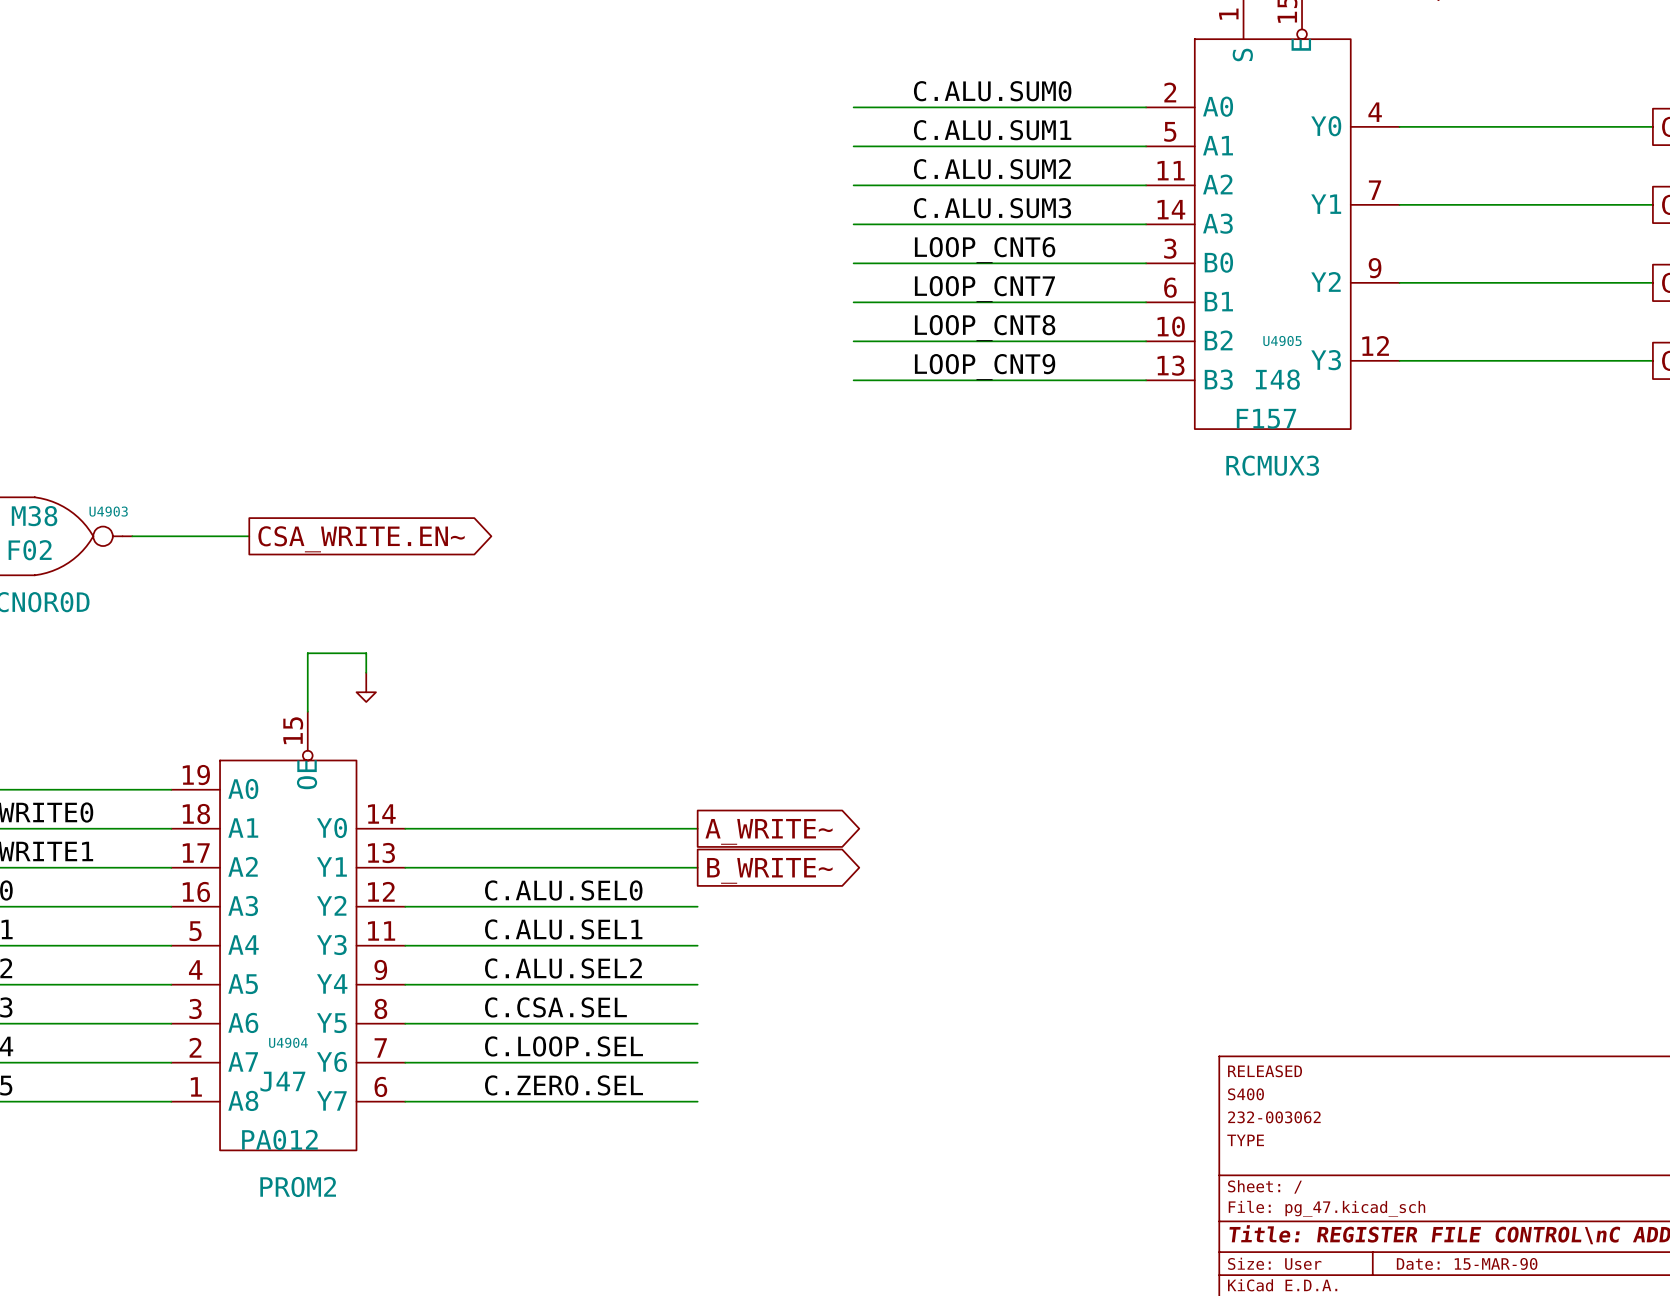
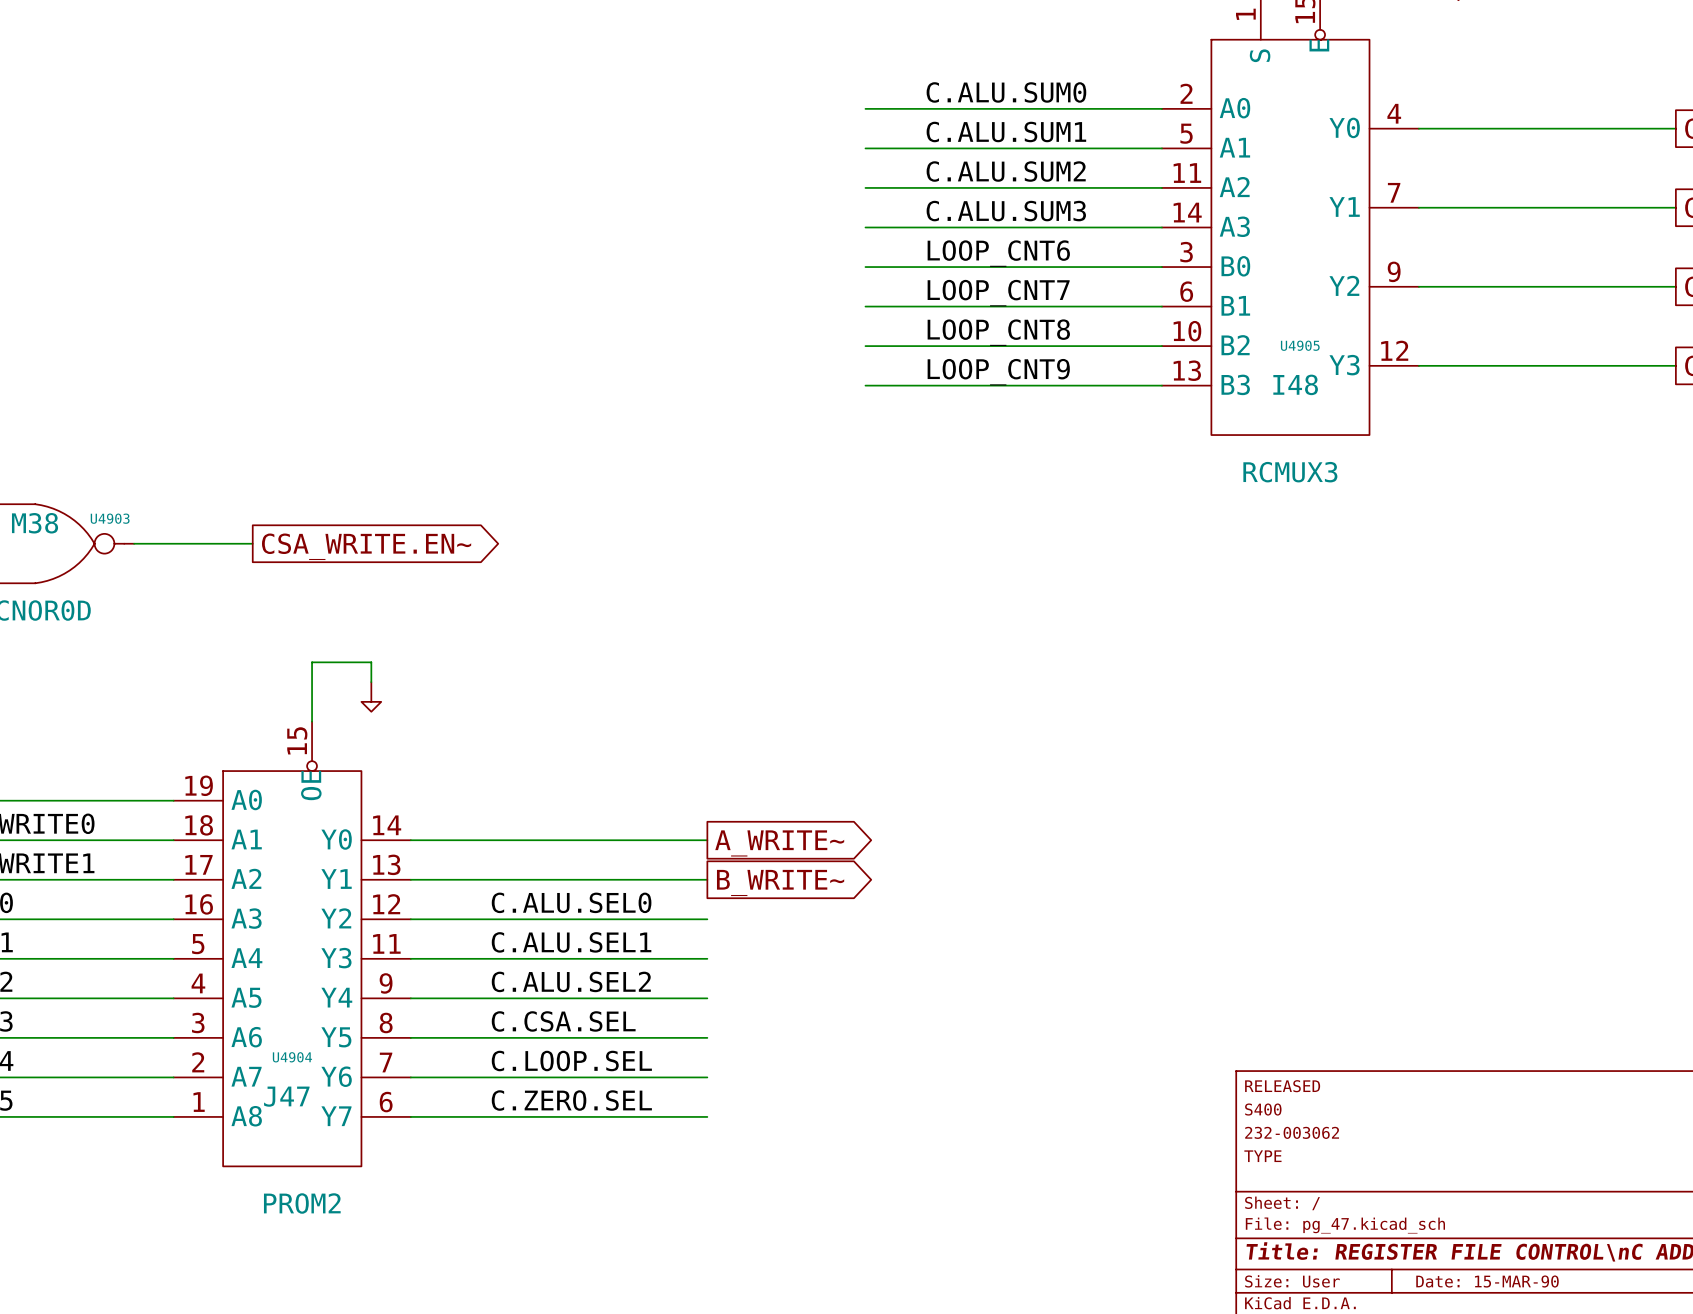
U4905 value: F157 (1266, 418) -> none
U4903 value: F02 (30, 550) -> none
U4904 value: PA012 (279, 1139) -> none

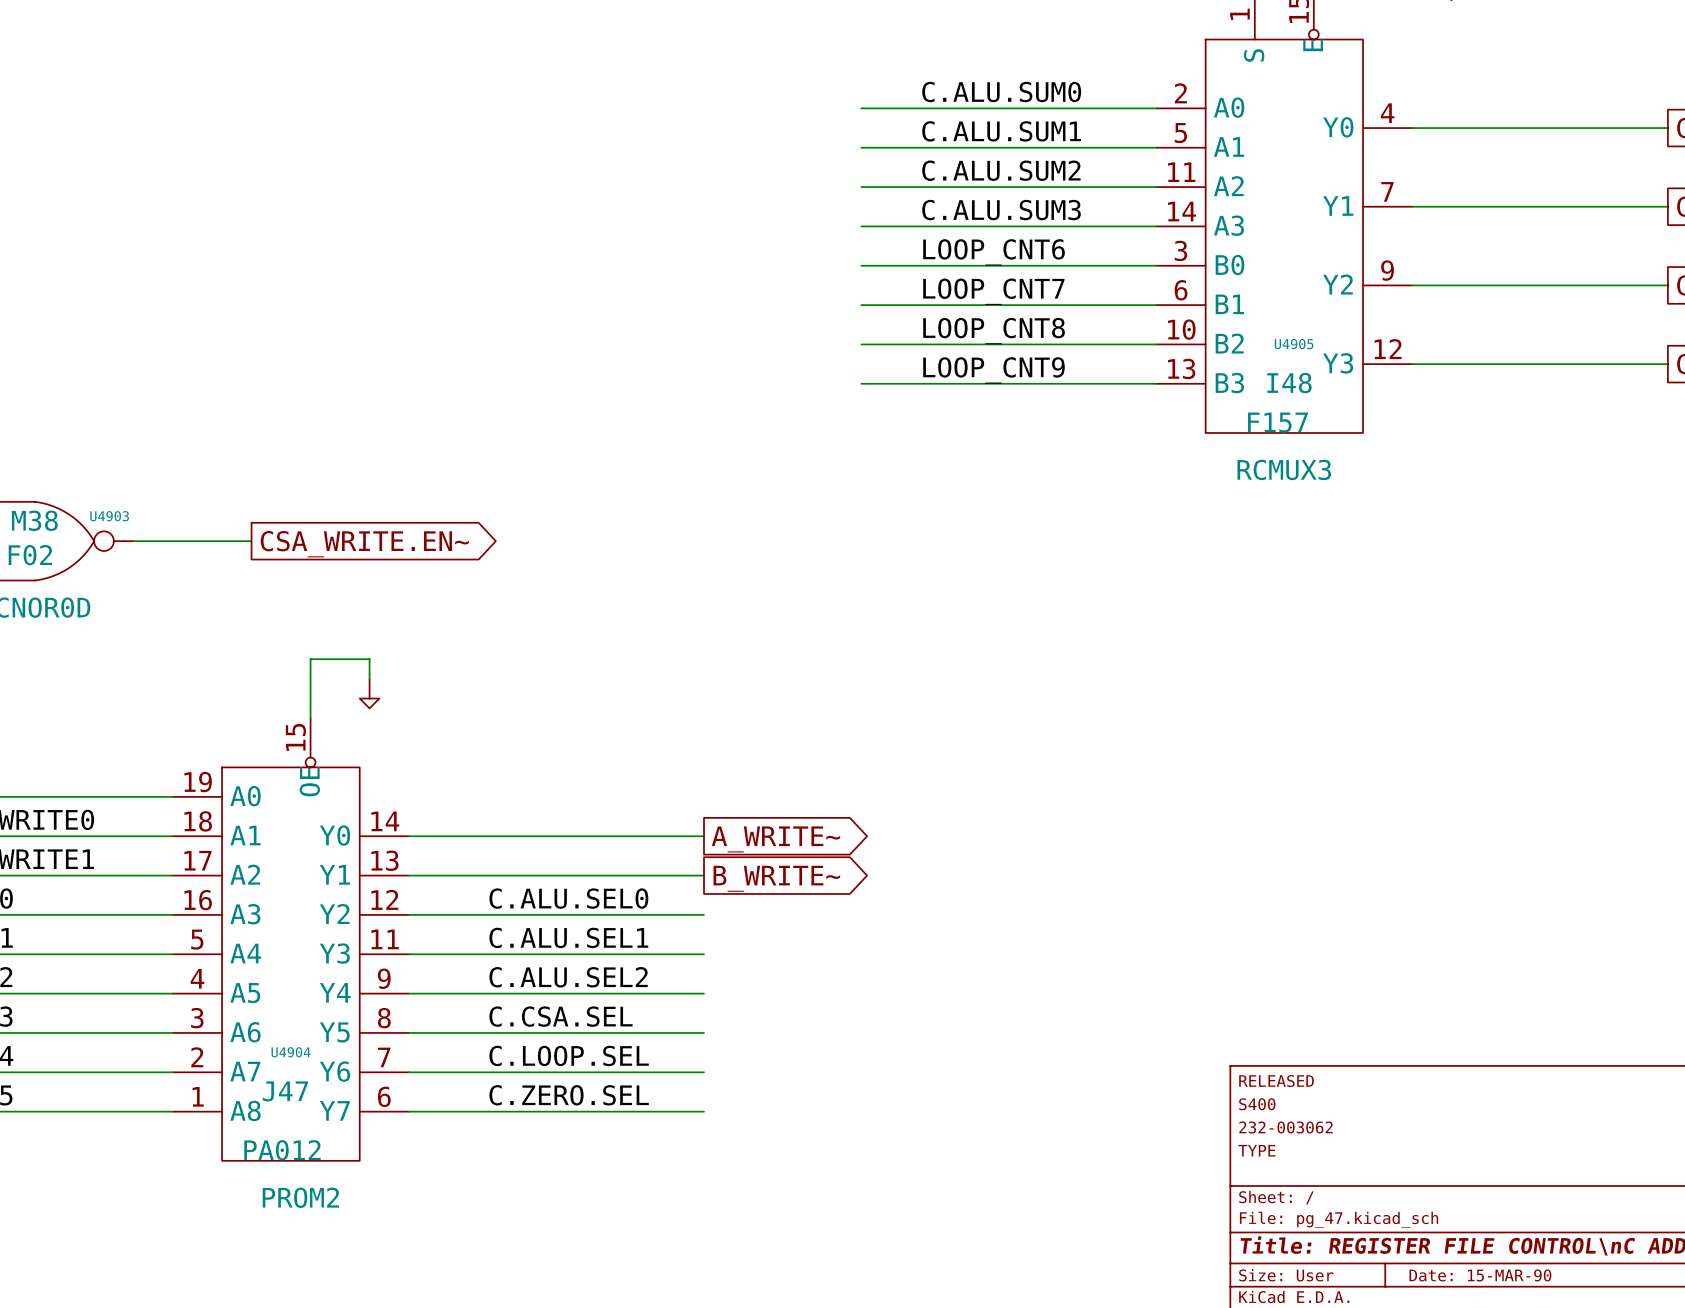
U4905 value: none -> F157 (1277, 422)
U4903 value: none -> F02 (30, 555)
U4904 value: none -> PA012 (282, 1150)

